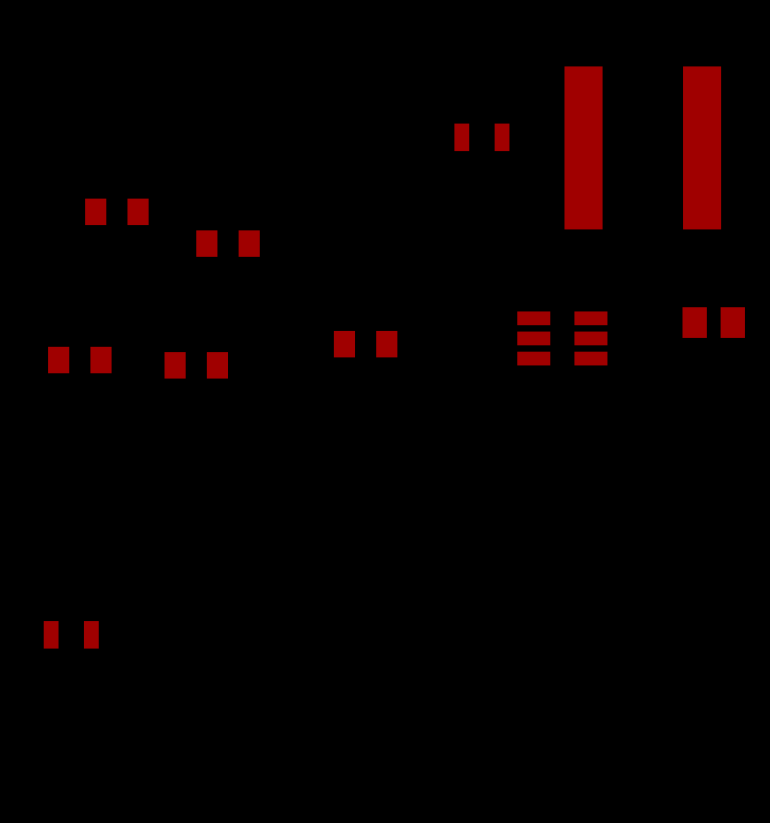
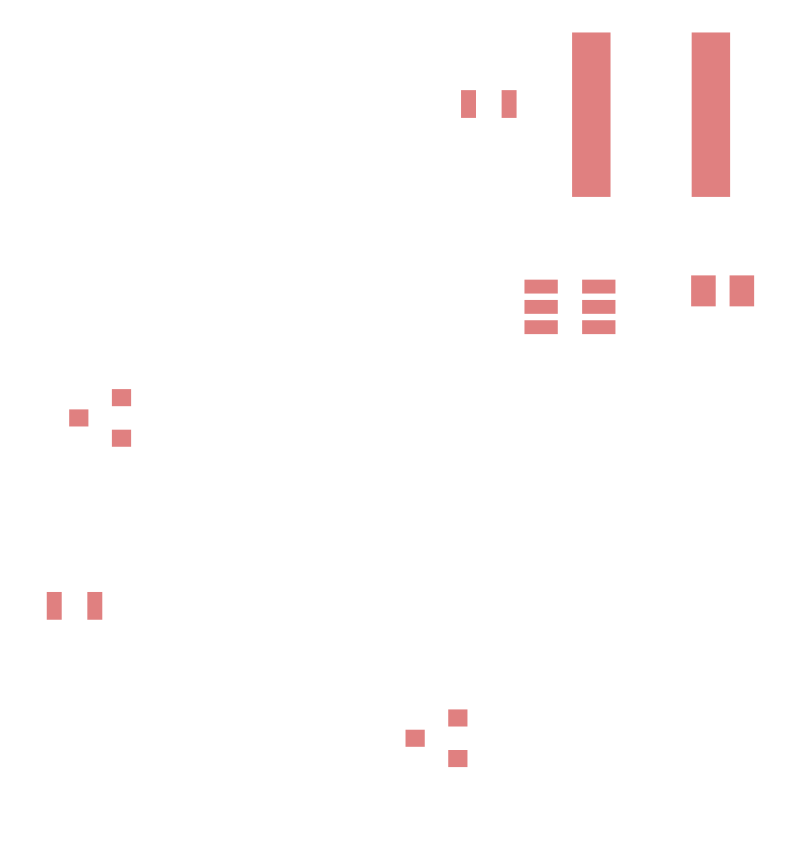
part: (116, 211) -> none
part: (228, 243) -> none
part: (365, 344) -> none
part: (79, 360) -> none
part: (196, 365) -> none
part: none -> (100, 417)
part: none -> (436, 738)

